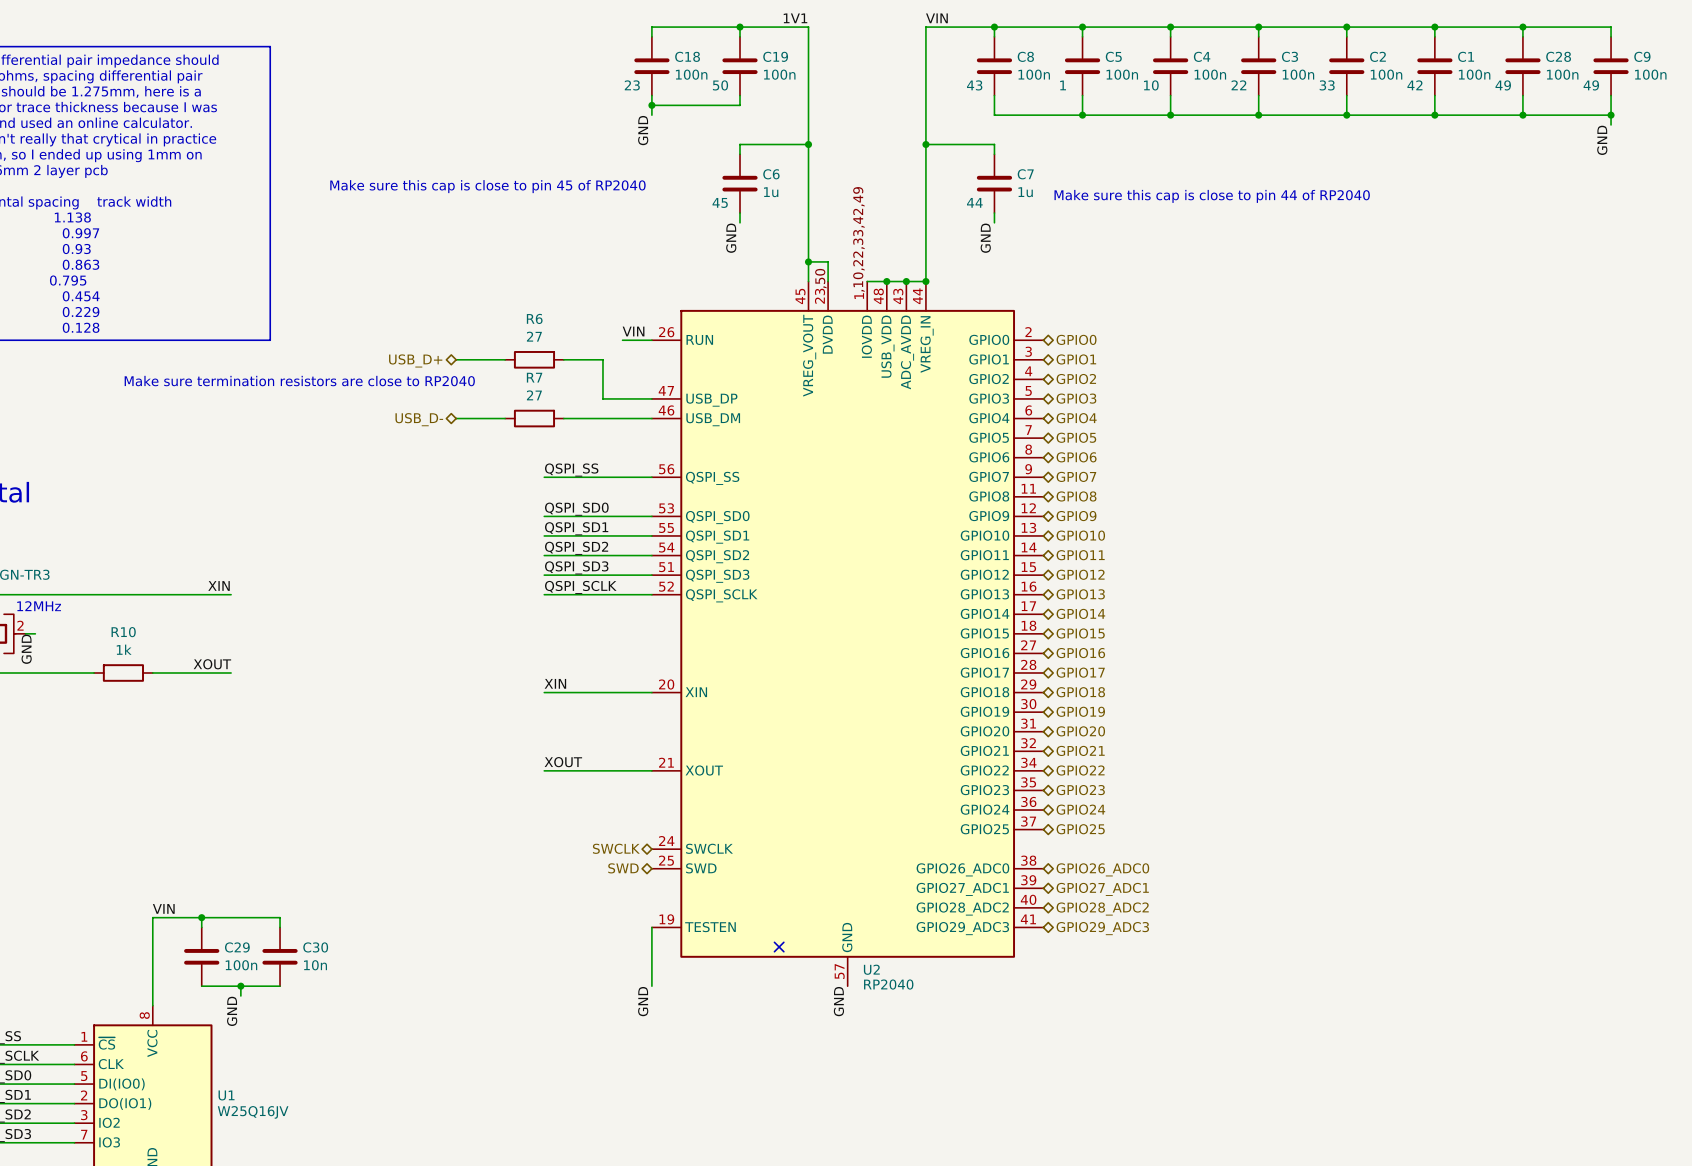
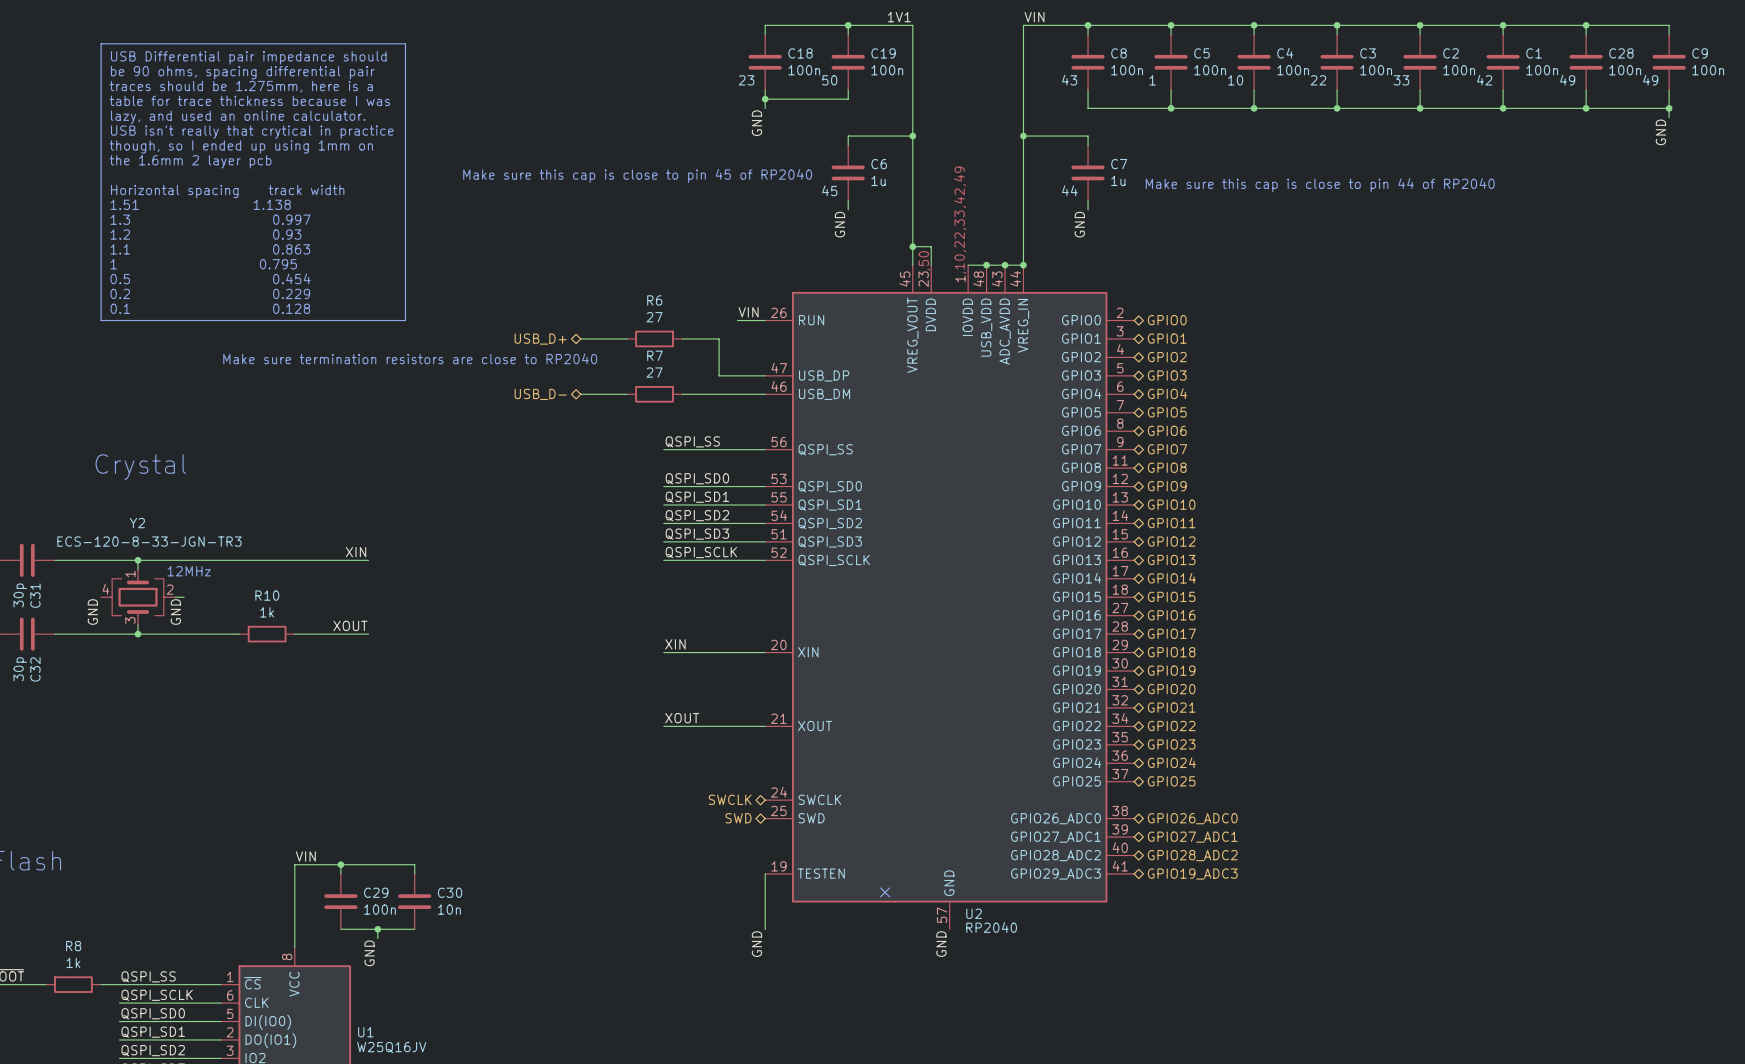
hierarchical label: GPIO29_ADC3 (1102, 928) -> GPIO19_ADC3 (1192, 874)

